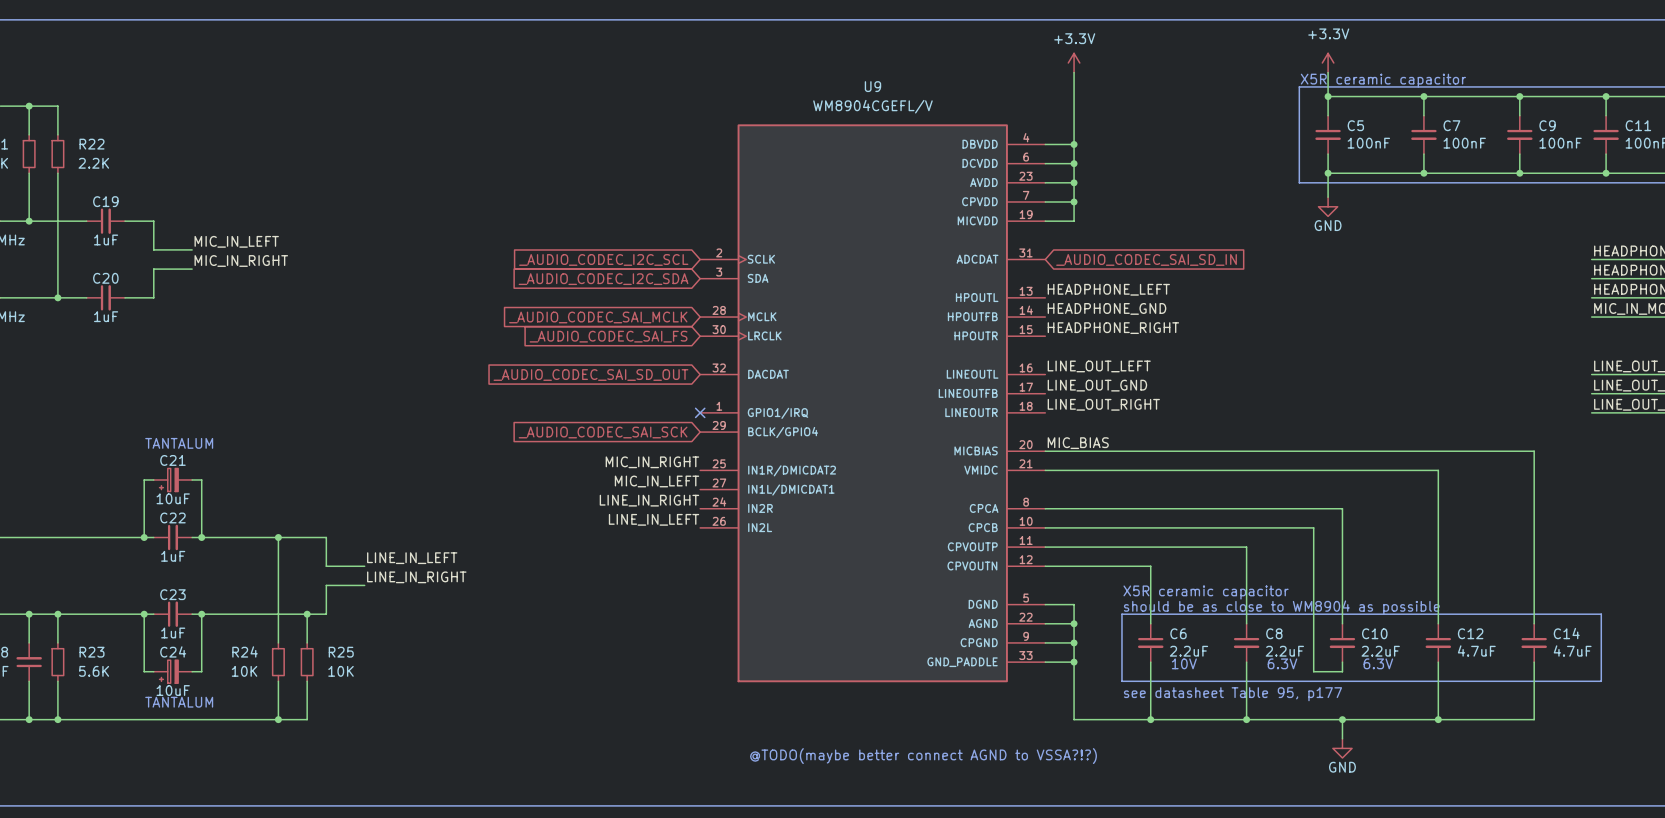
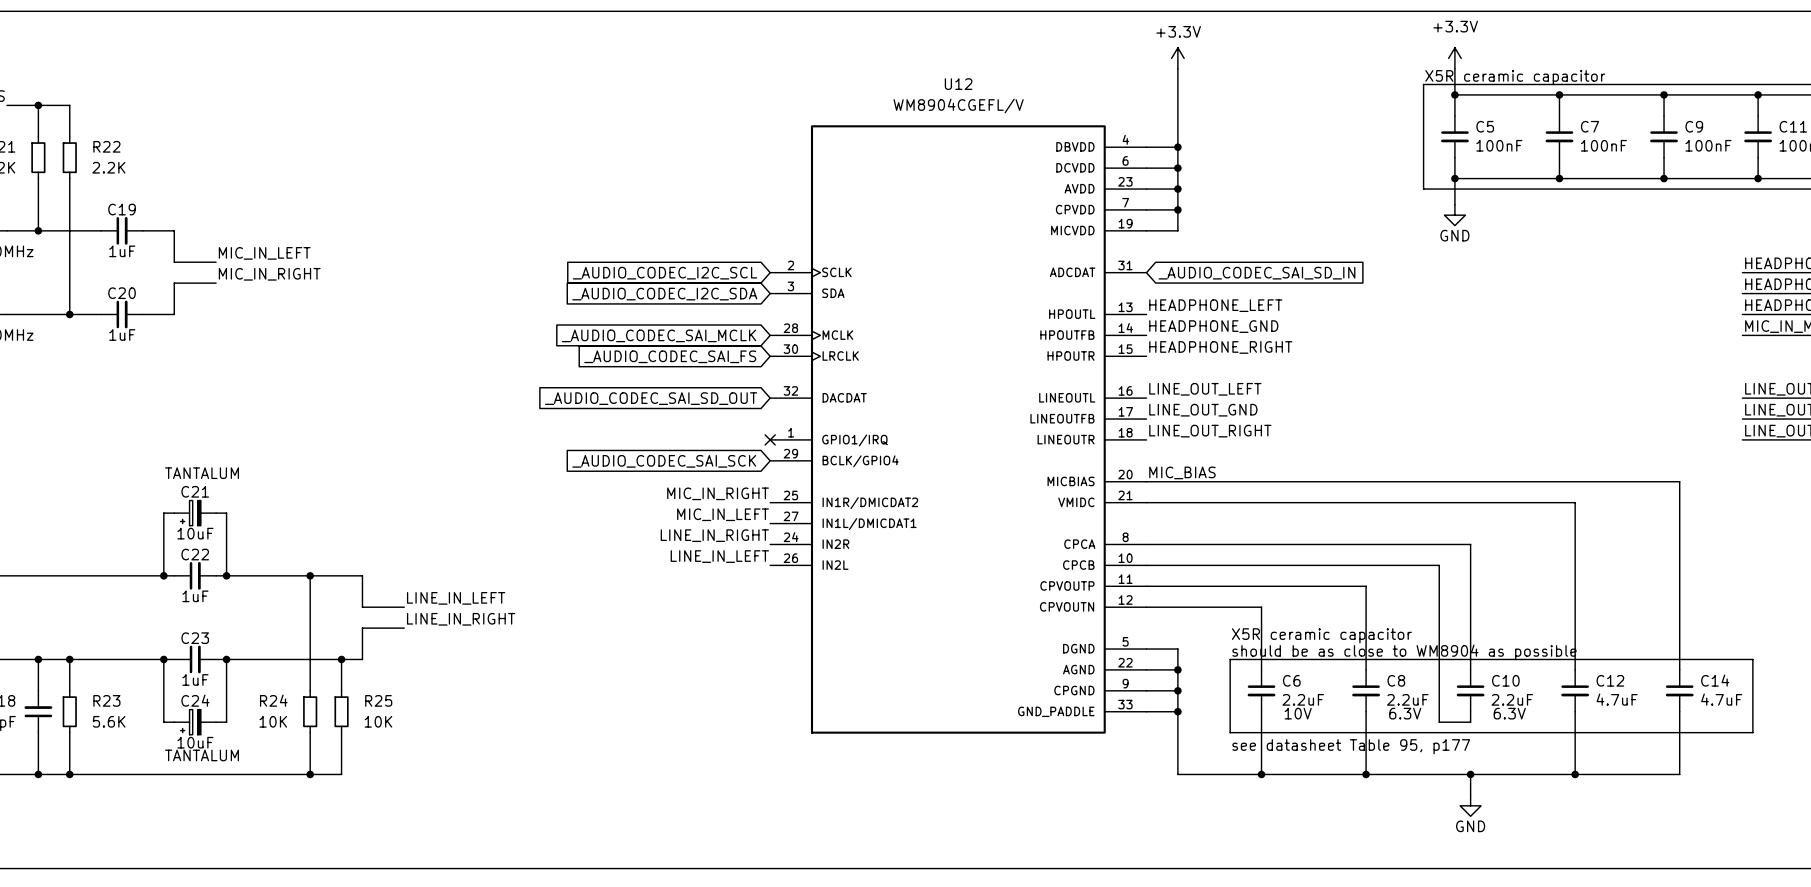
U9 name: U9 (872, 86) -> U12 (958, 84)
text: @TODO(maybe better connect AGND to VSSA?!?) (923, 756) -> none

